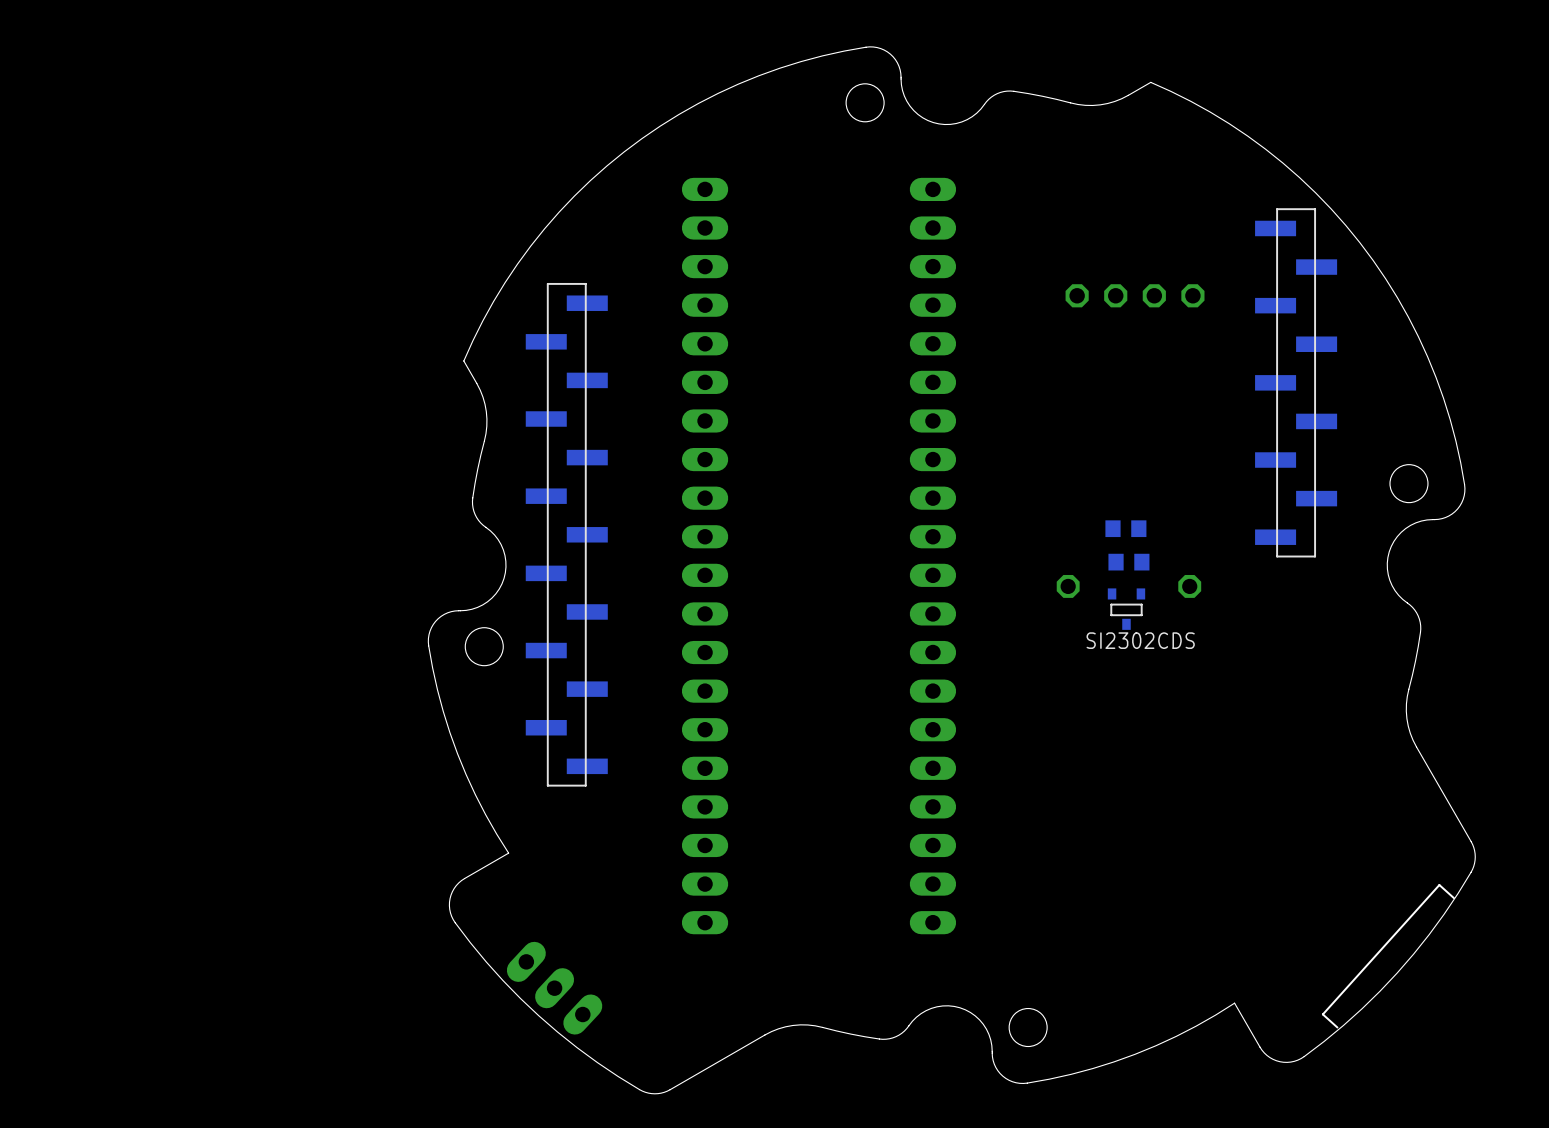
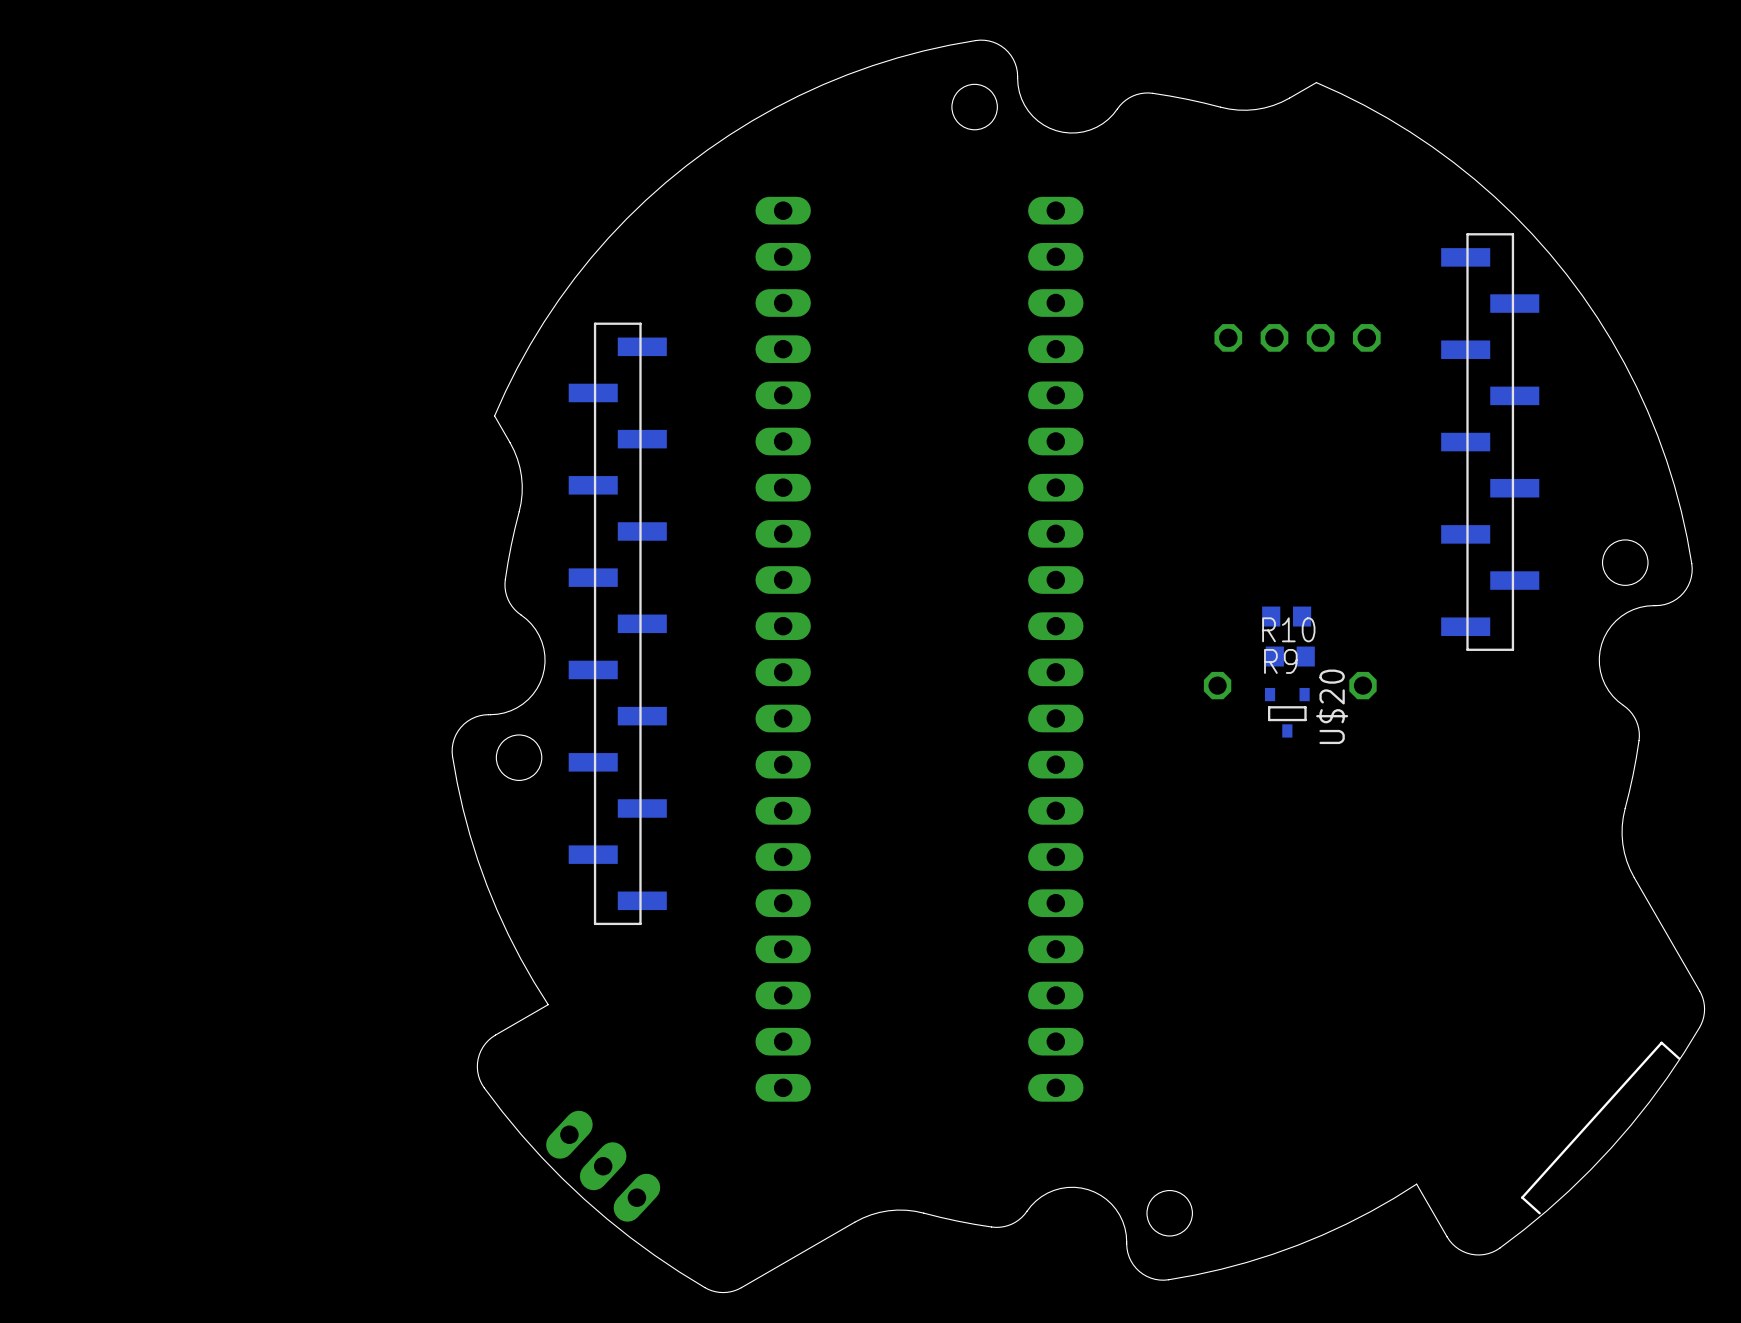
R10 name: none -> R10 (1288, 629)
R9 name: none -> R9 (1280, 661)
SI2302CDS name: SI2302CDS (1140, 640) -> U$20 (1332, 706)

